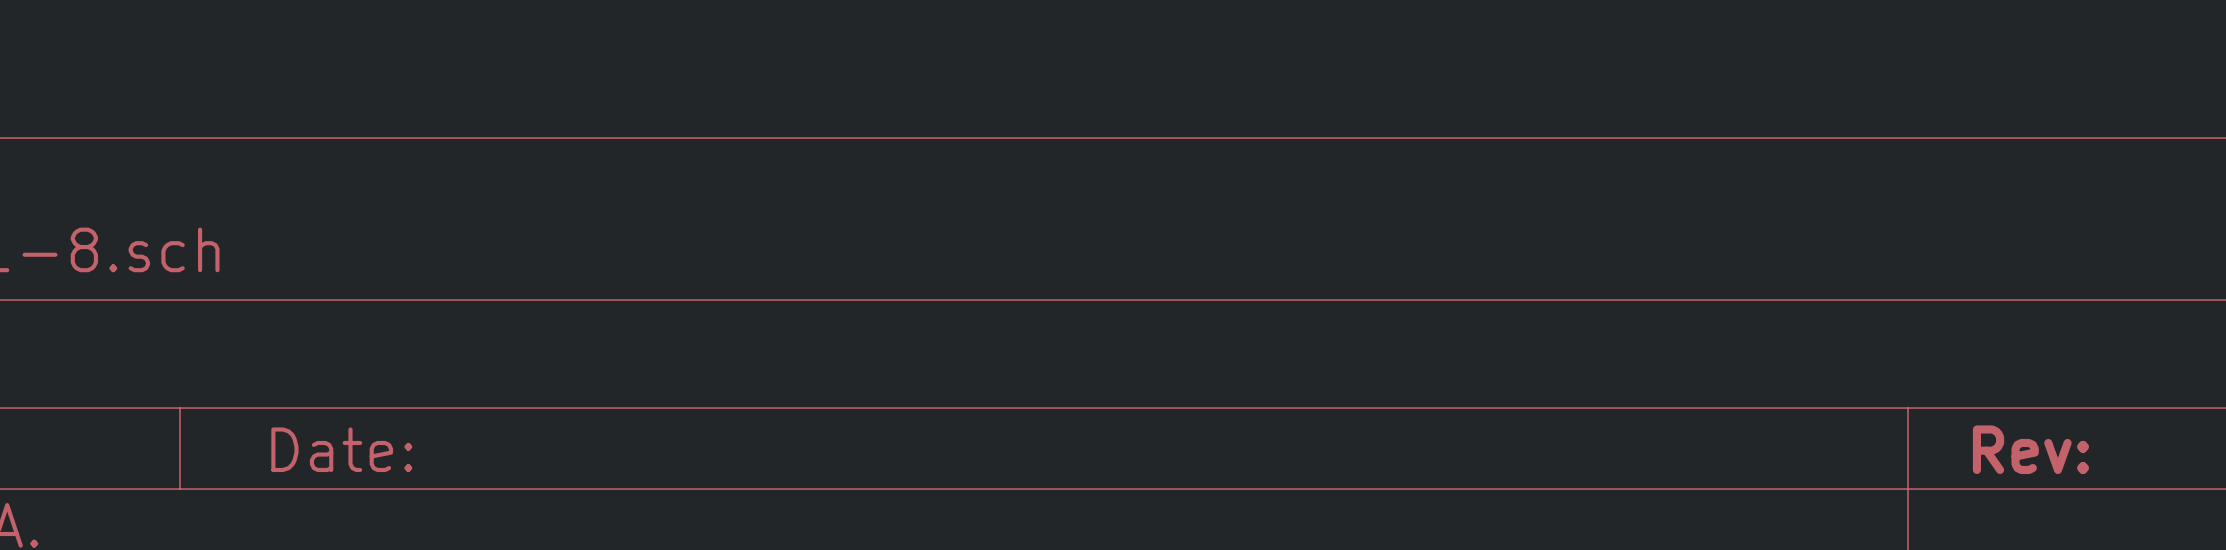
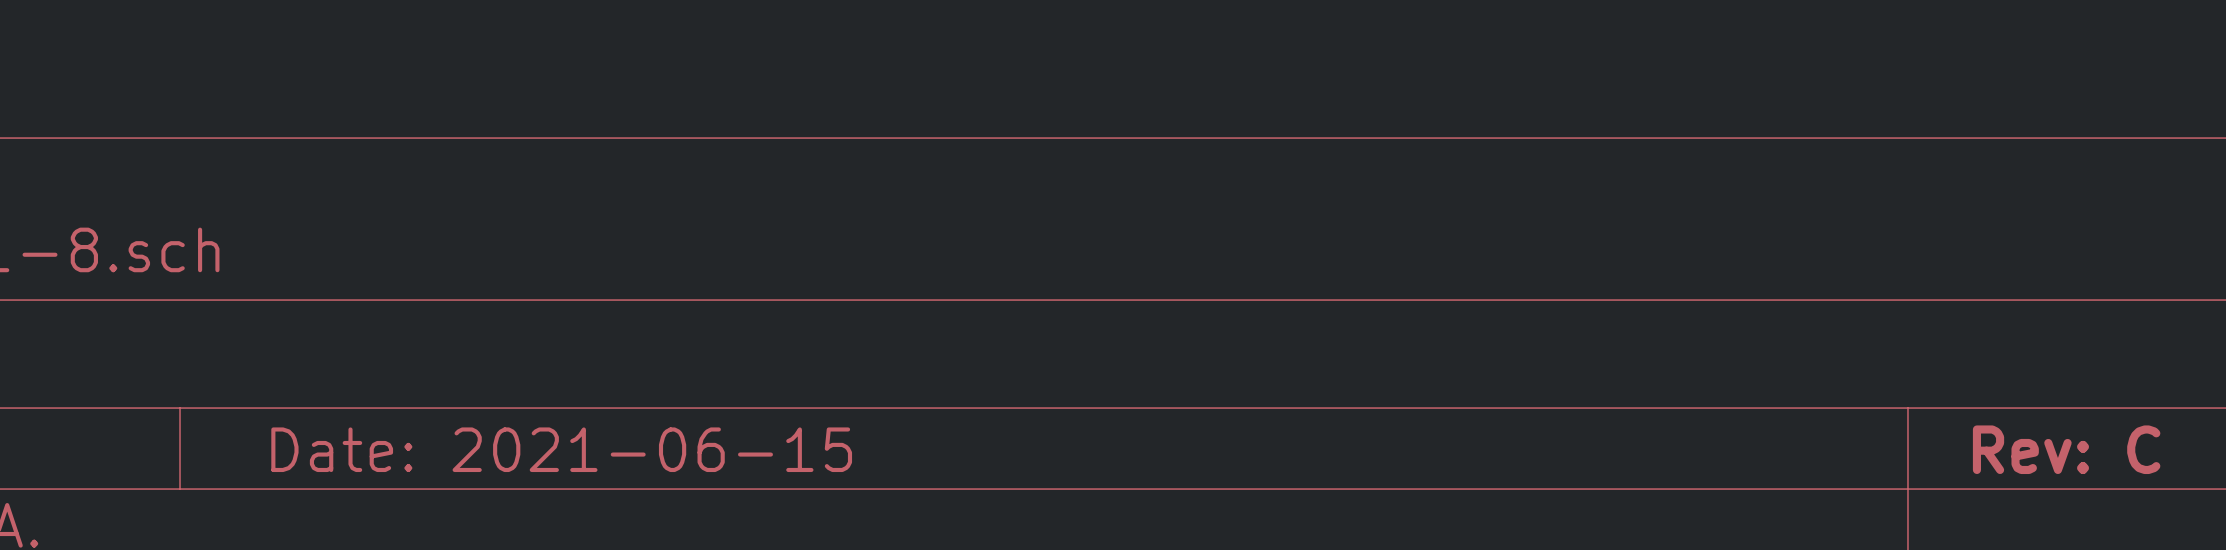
title block: Date: (341, 449) -> Date: 2021-06-15 (561, 449)
title block: Rev: (2030, 449) -> Rev: C (2066, 449)

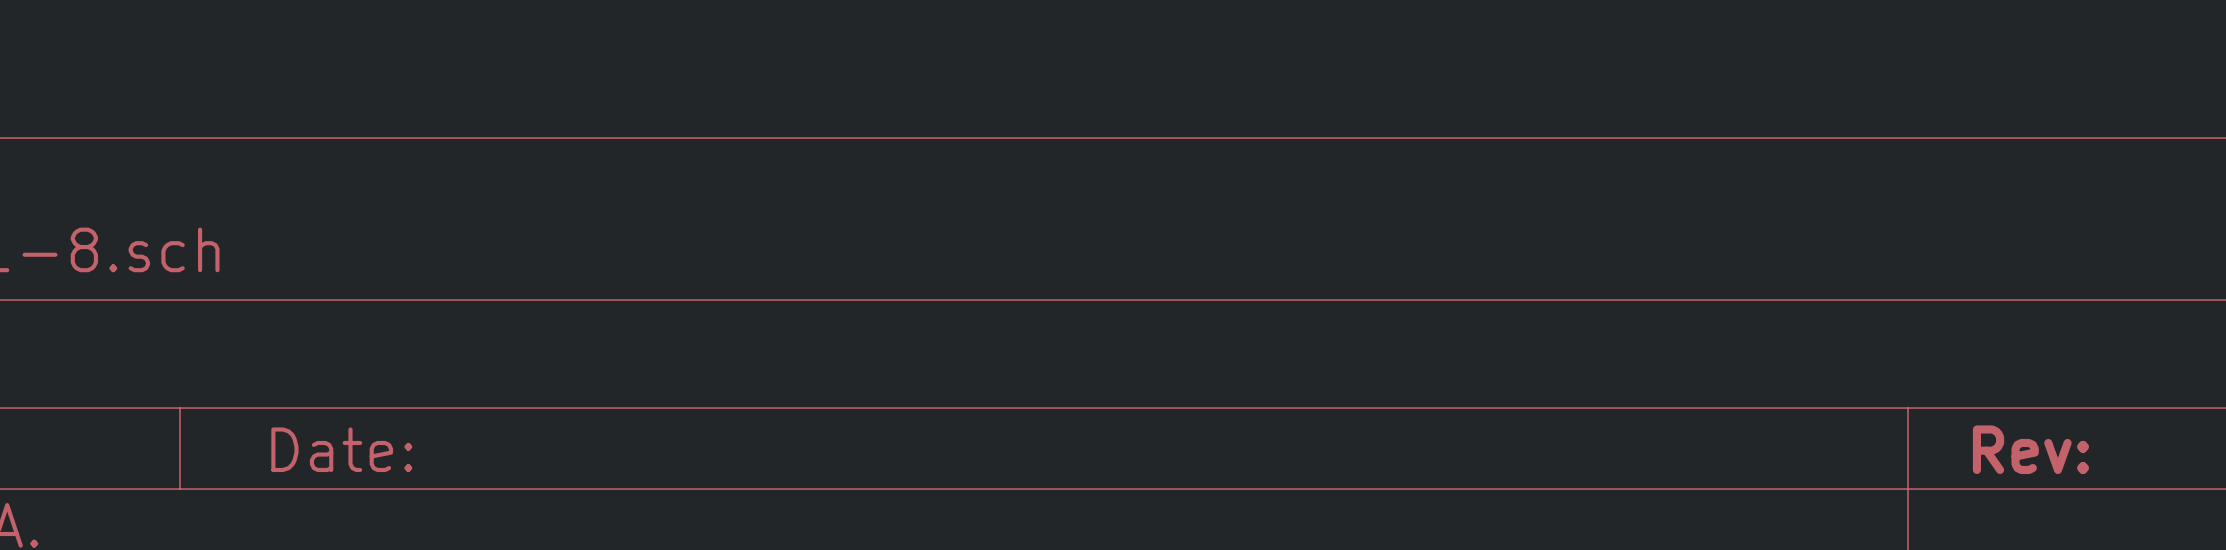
title block: Date: 2021-06-15 (561, 449) -> Date: (341, 449)
title block: Rev: C (2066, 449) -> Rev: (2030, 449)

